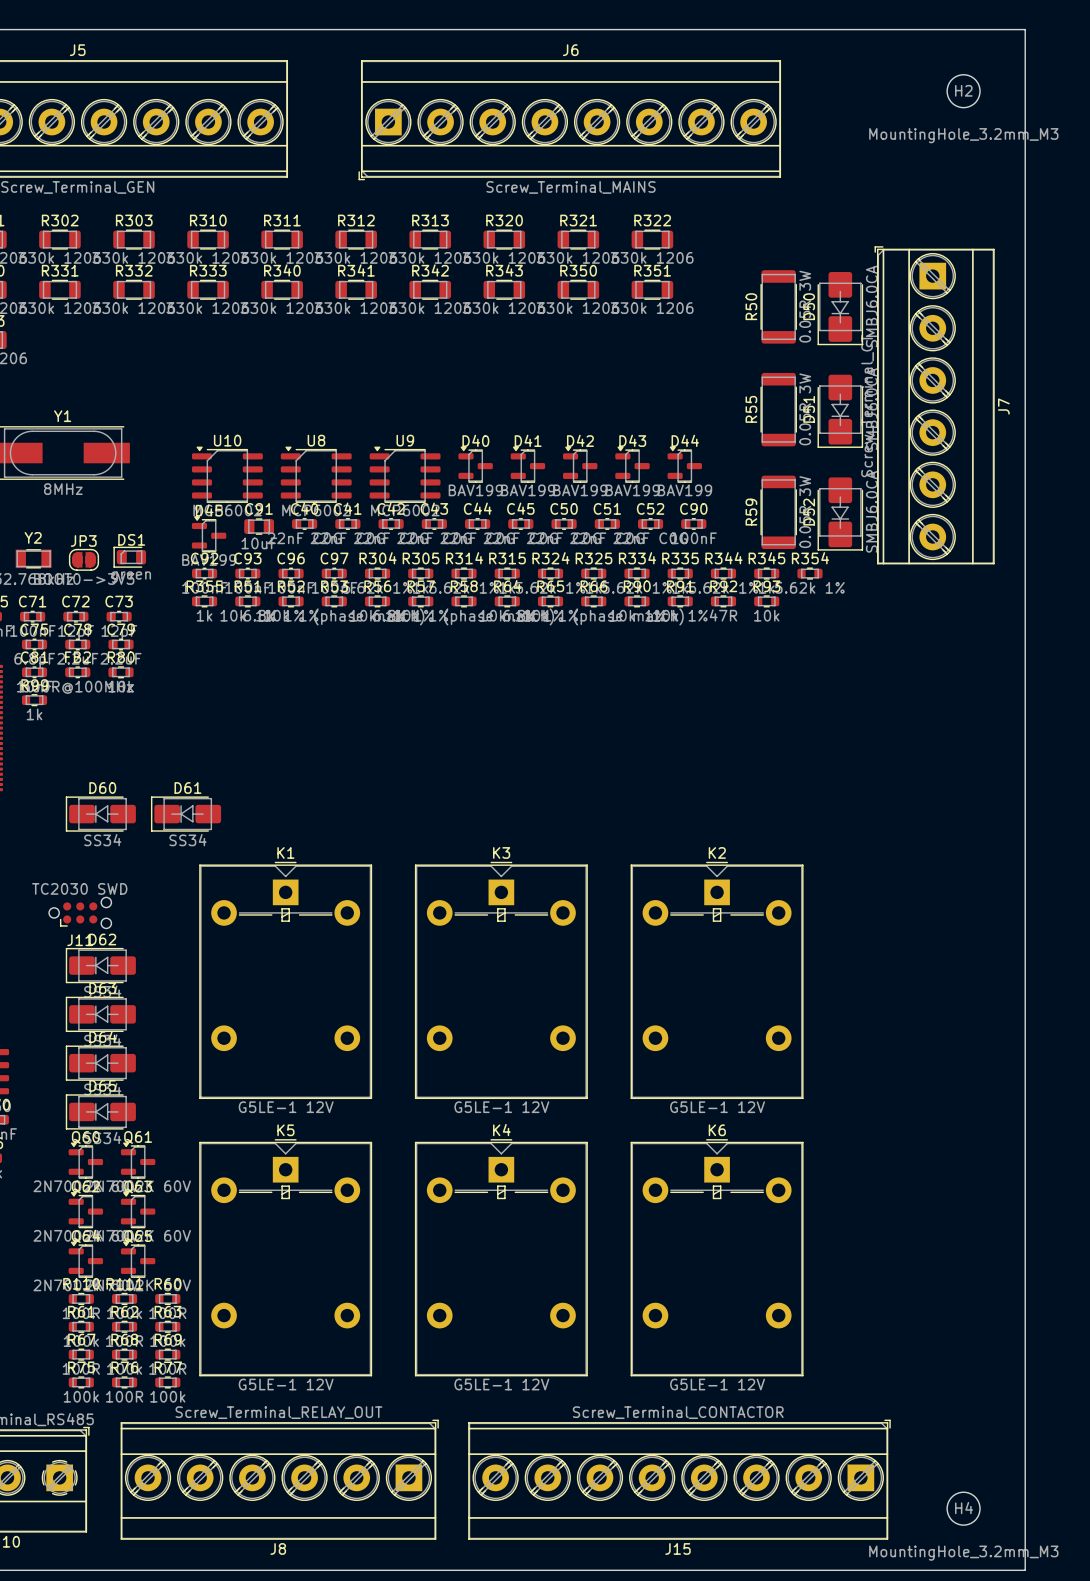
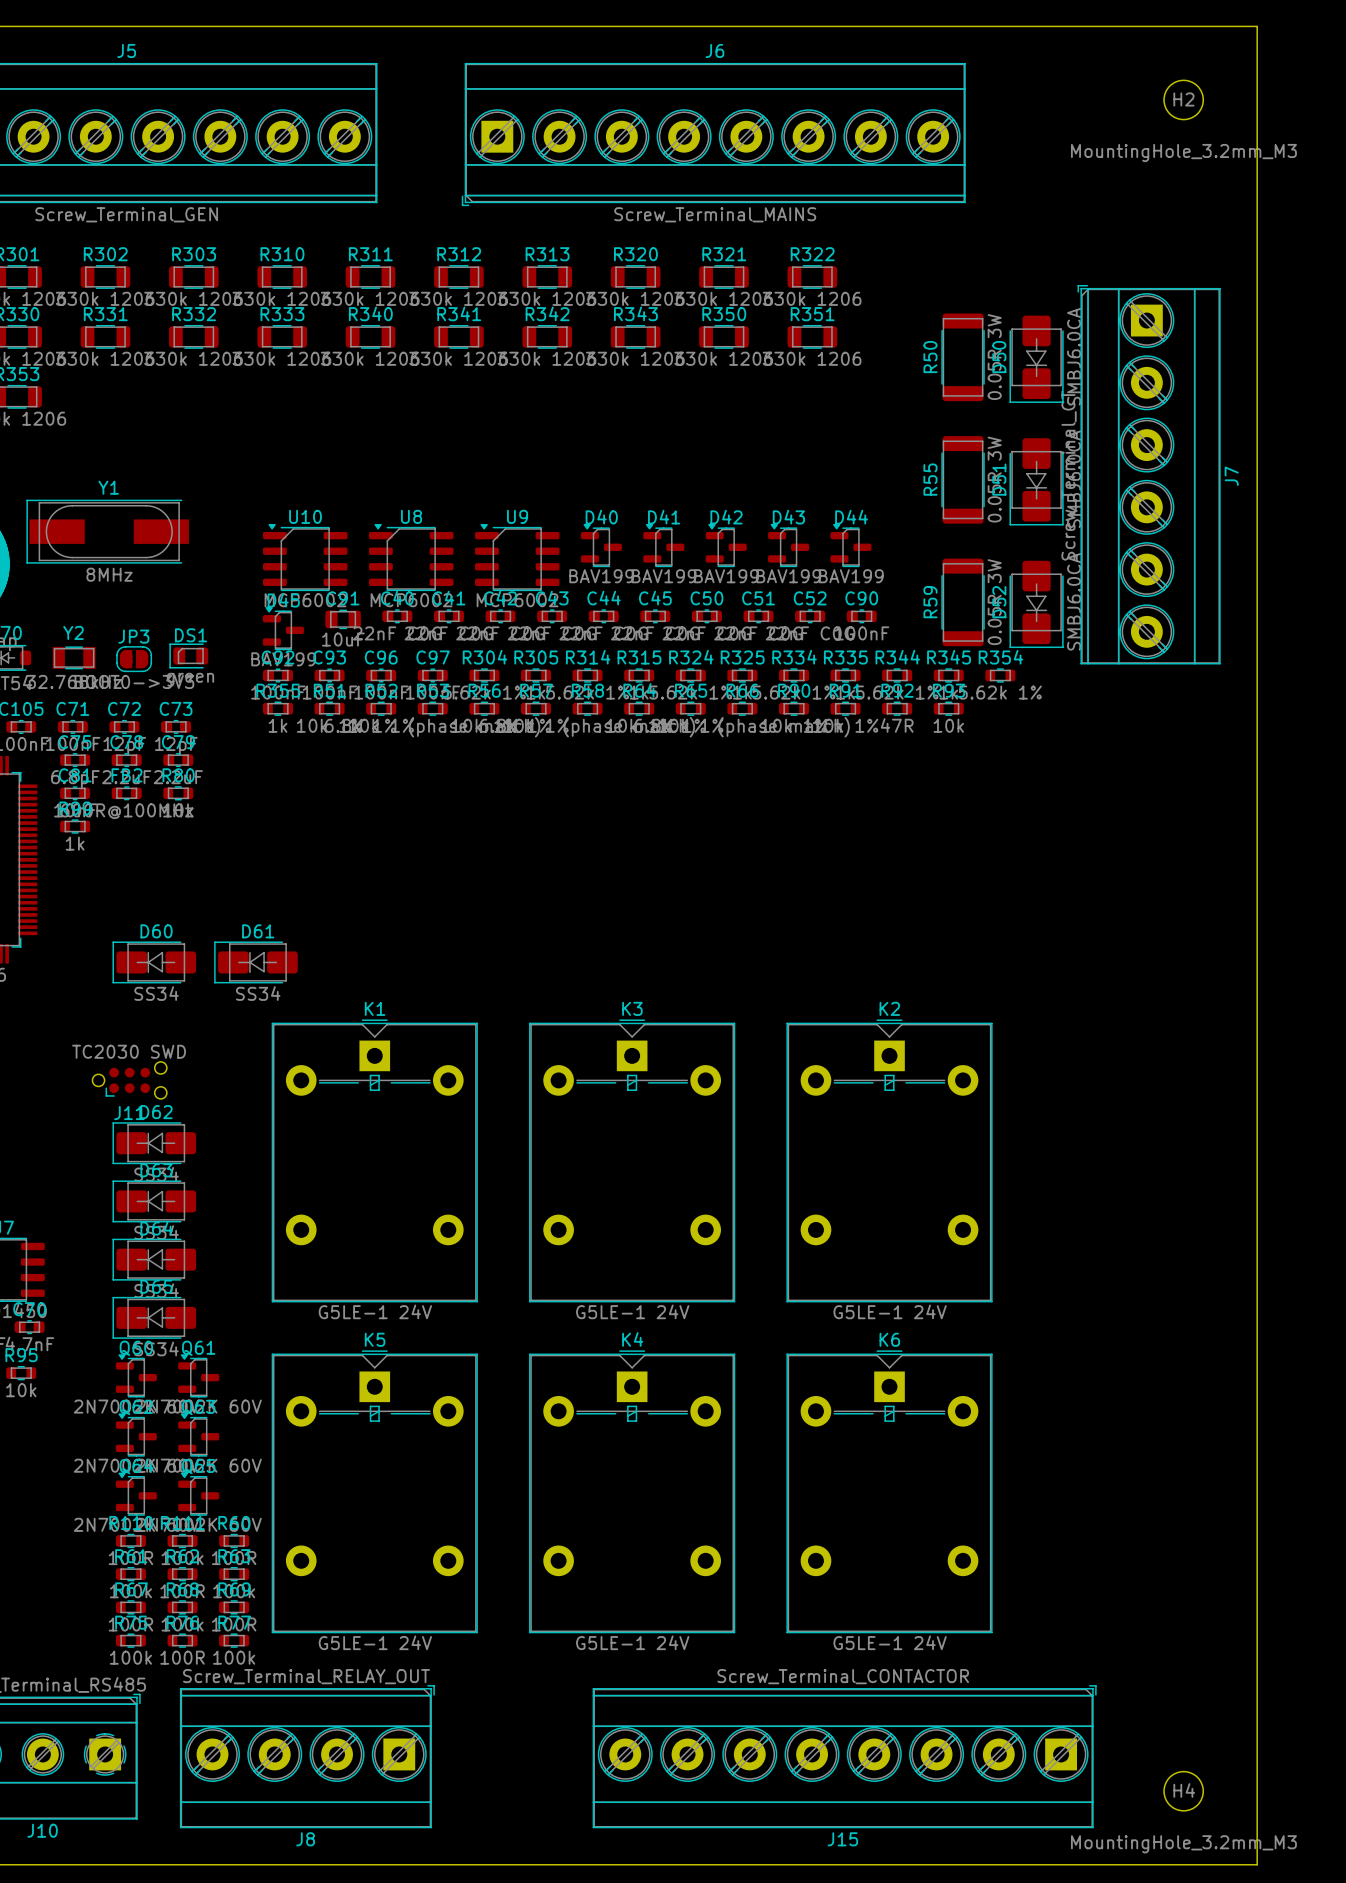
K1 value: G5LE-1 12V (286, 1107) -> G5LE-1 24V (375, 1311)
K3 value: G5LE-1 12V (501, 1107) -> G5LE-1 24V (632, 1311)
K2 value: G5LE-1 12V (717, 1107) -> G5LE-1 24V (890, 1311)
K5 value: G5LE-1 12V (286, 1384) -> G5LE-1 24V (375, 1642)
K4 value: G5LE-1 12V (501, 1384) -> G5LE-1 24V (632, 1642)
K6 value: G5LE-1 12V (717, 1384) -> G5LE-1 24V (890, 1642)
J8 footprint: [120, 1419, 439, 1540] -> [179, 1685, 435, 1829]

